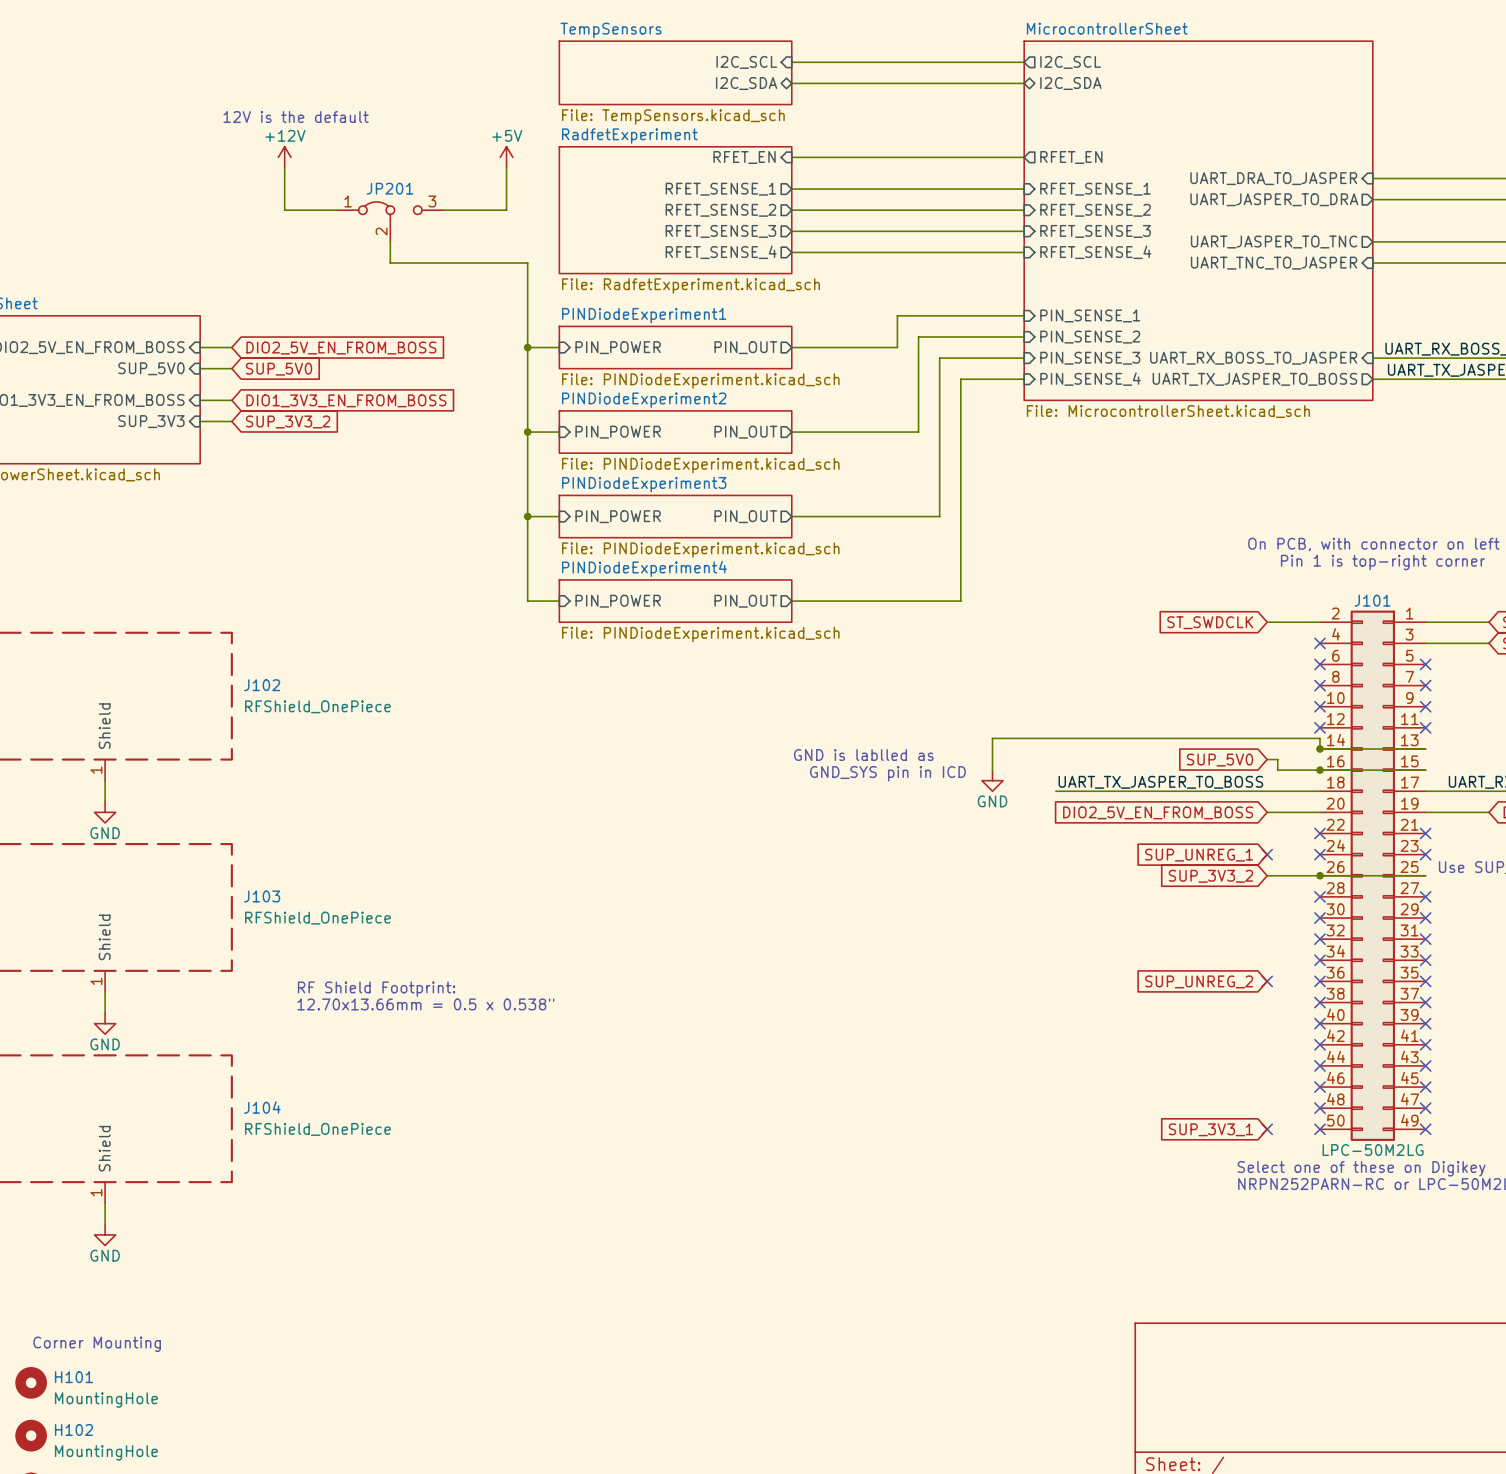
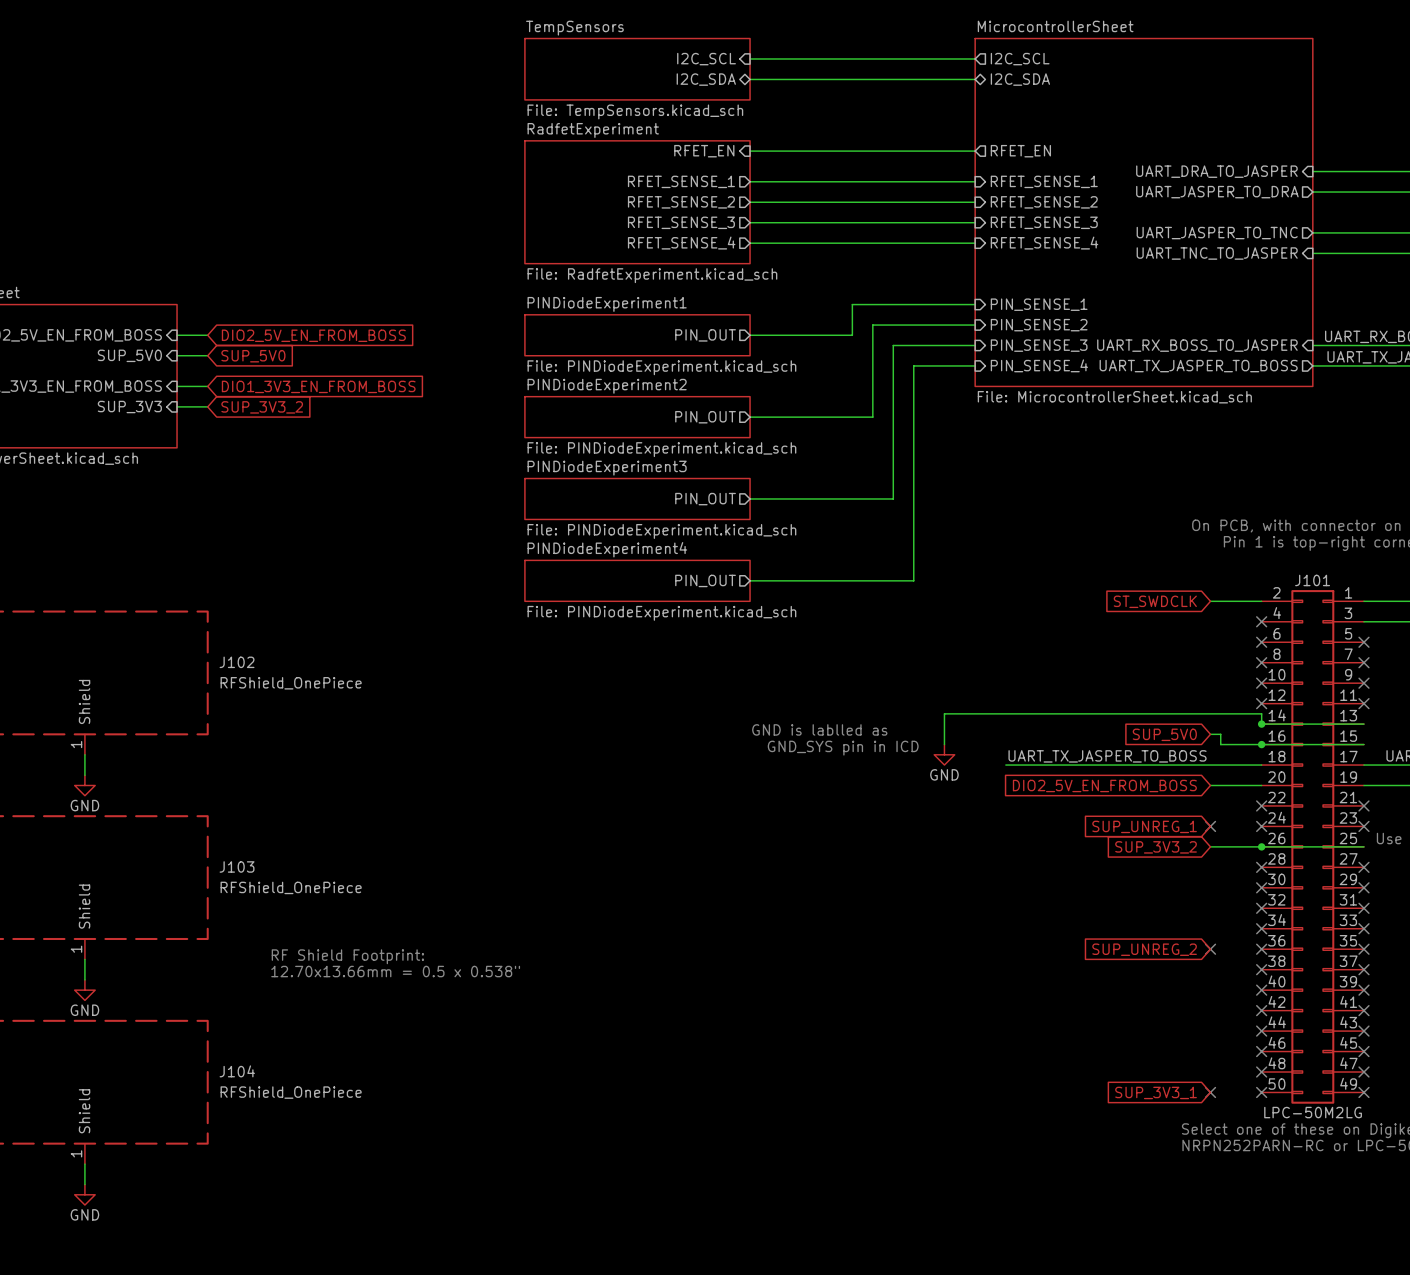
text: 12V is the default (296, 117) -> none
power symbol: +12V (284, 157) -> none
power symbol: +5V (506, 157) -> none
wire: (284, 167) (284, 210) (337, 210) -> none
wire: (506, 167) (506, 210) (443, 210) -> none
JP201: (390, 221) -> none
wire: (390, 241) (390, 263) (527, 263) (527, 601) (559, 601) -> none
wire: (527, 347) (559, 347) -> none
junction: (527, 347) -> none
sheet pin: PIN_POWER (618, 347) -> none
wire: (527, 432) (559, 432) -> none
junction: (527, 432) -> none
sheet pin: PIN_POWER (618, 432) -> none
wire: (527, 516) (559, 516) -> none
junction: (527, 516) -> none
sheet pin: PIN_POWER (618, 516) -> none
sheet pin: PIN_POWER (618, 601) -> none

